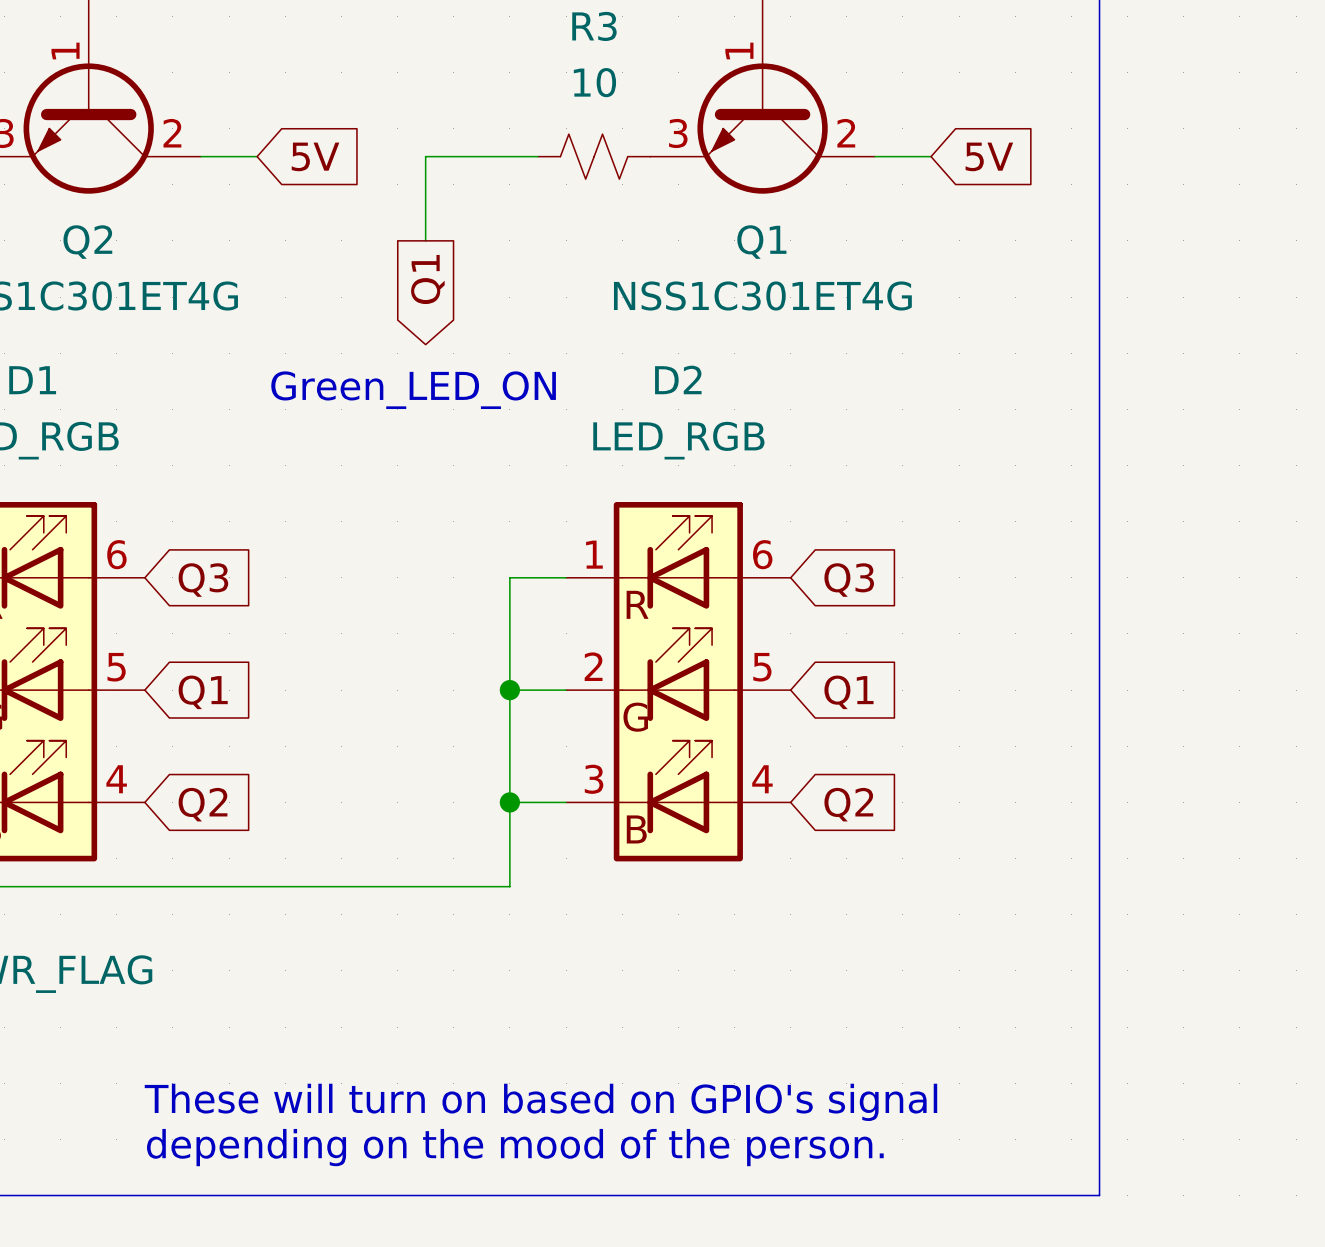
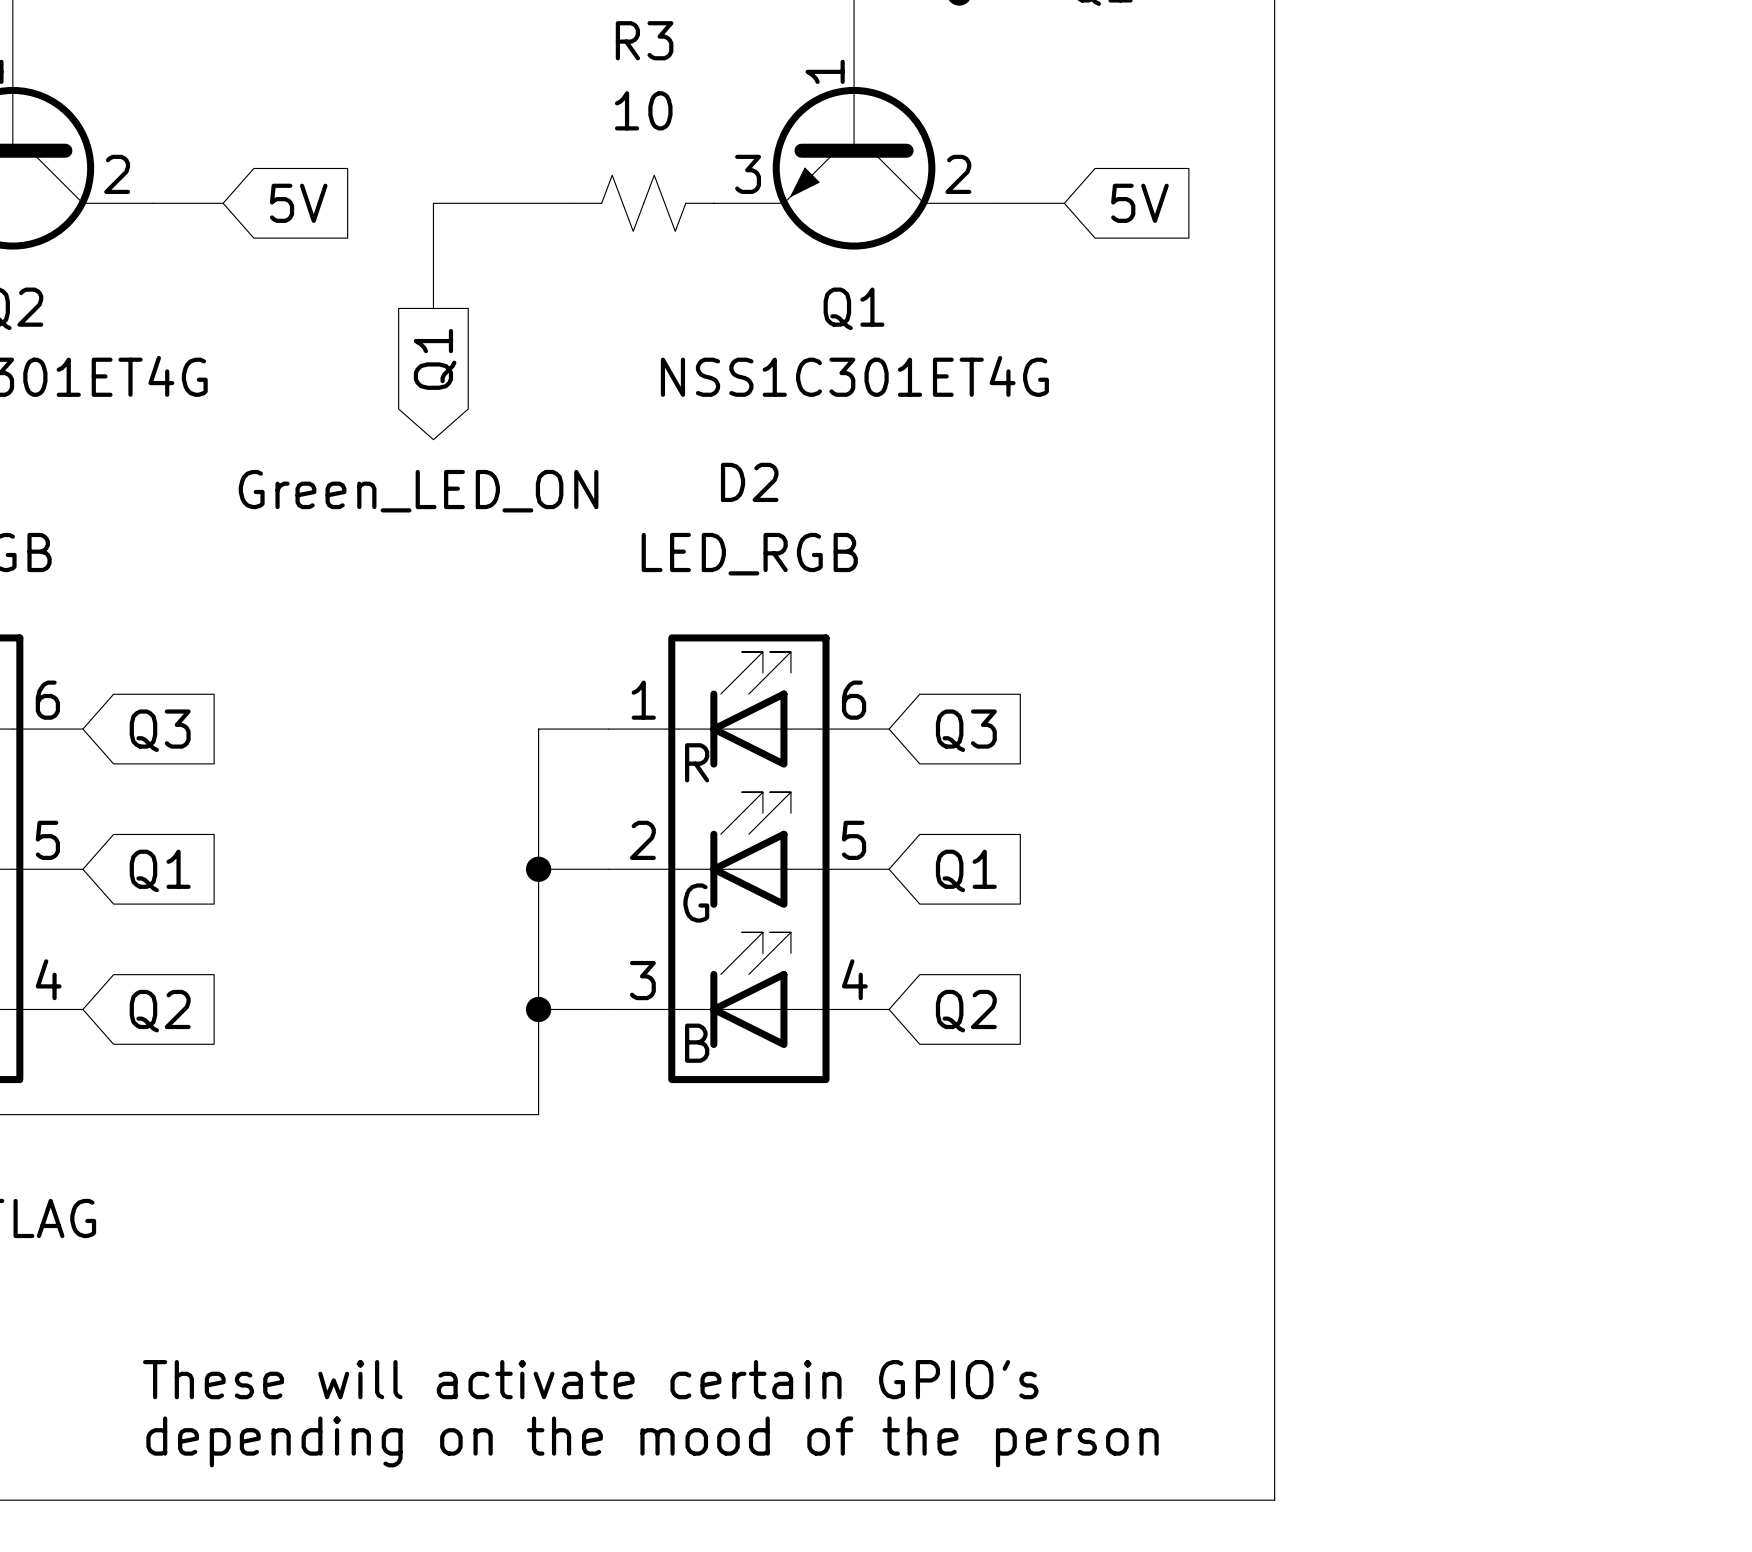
text: none -> These will activate certain GPIO's (590, 1379)
text: These will turn on based on GPIO's signal (540, 1102) -> none
text: depending on the mood of the person. (515, 1147) -> depending on the mood of the person (652, 1441)

